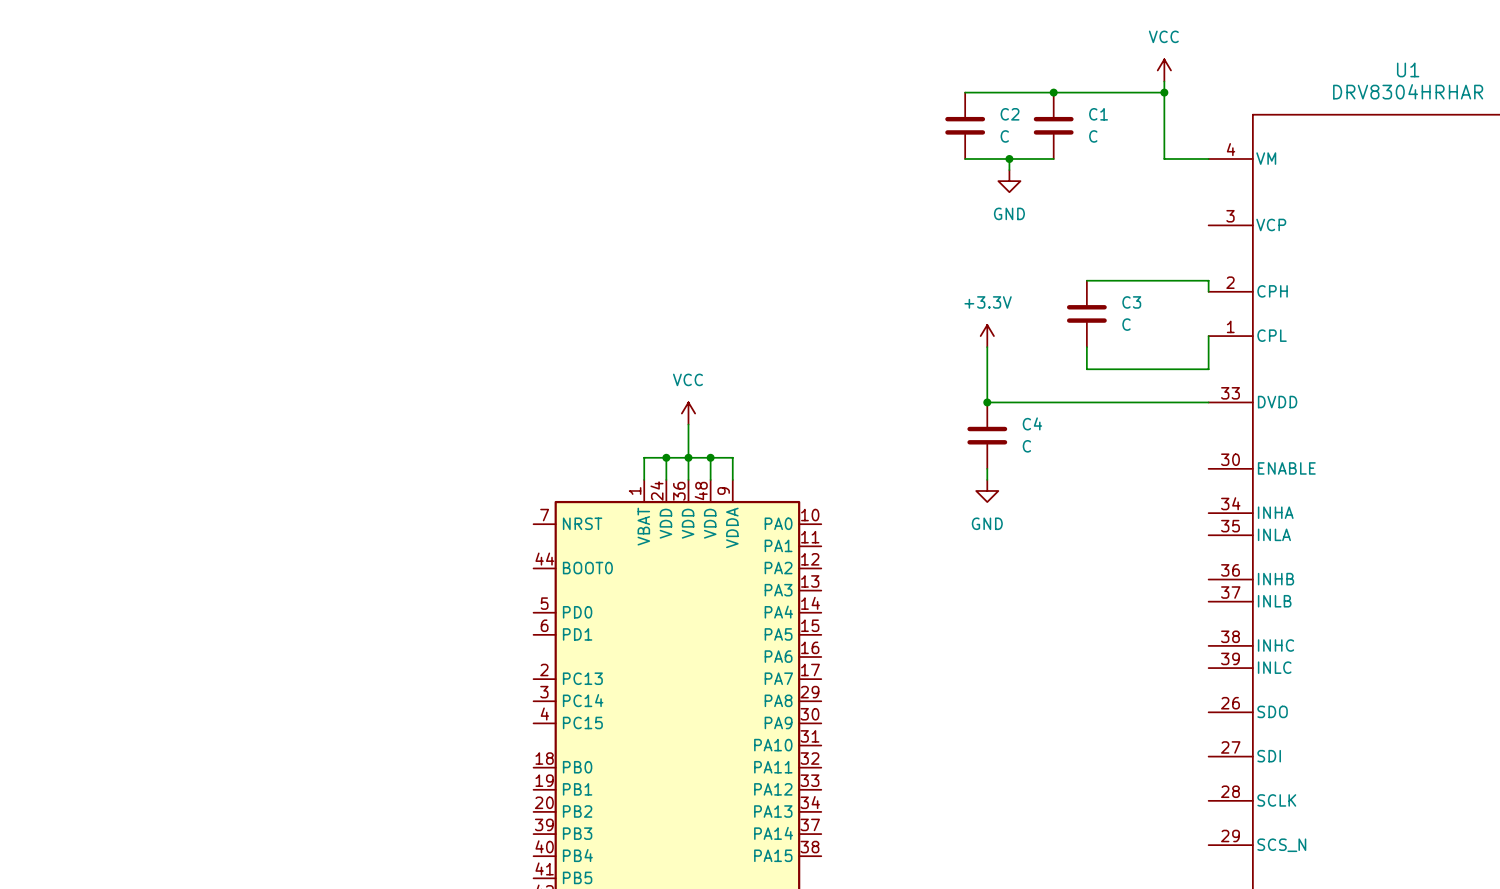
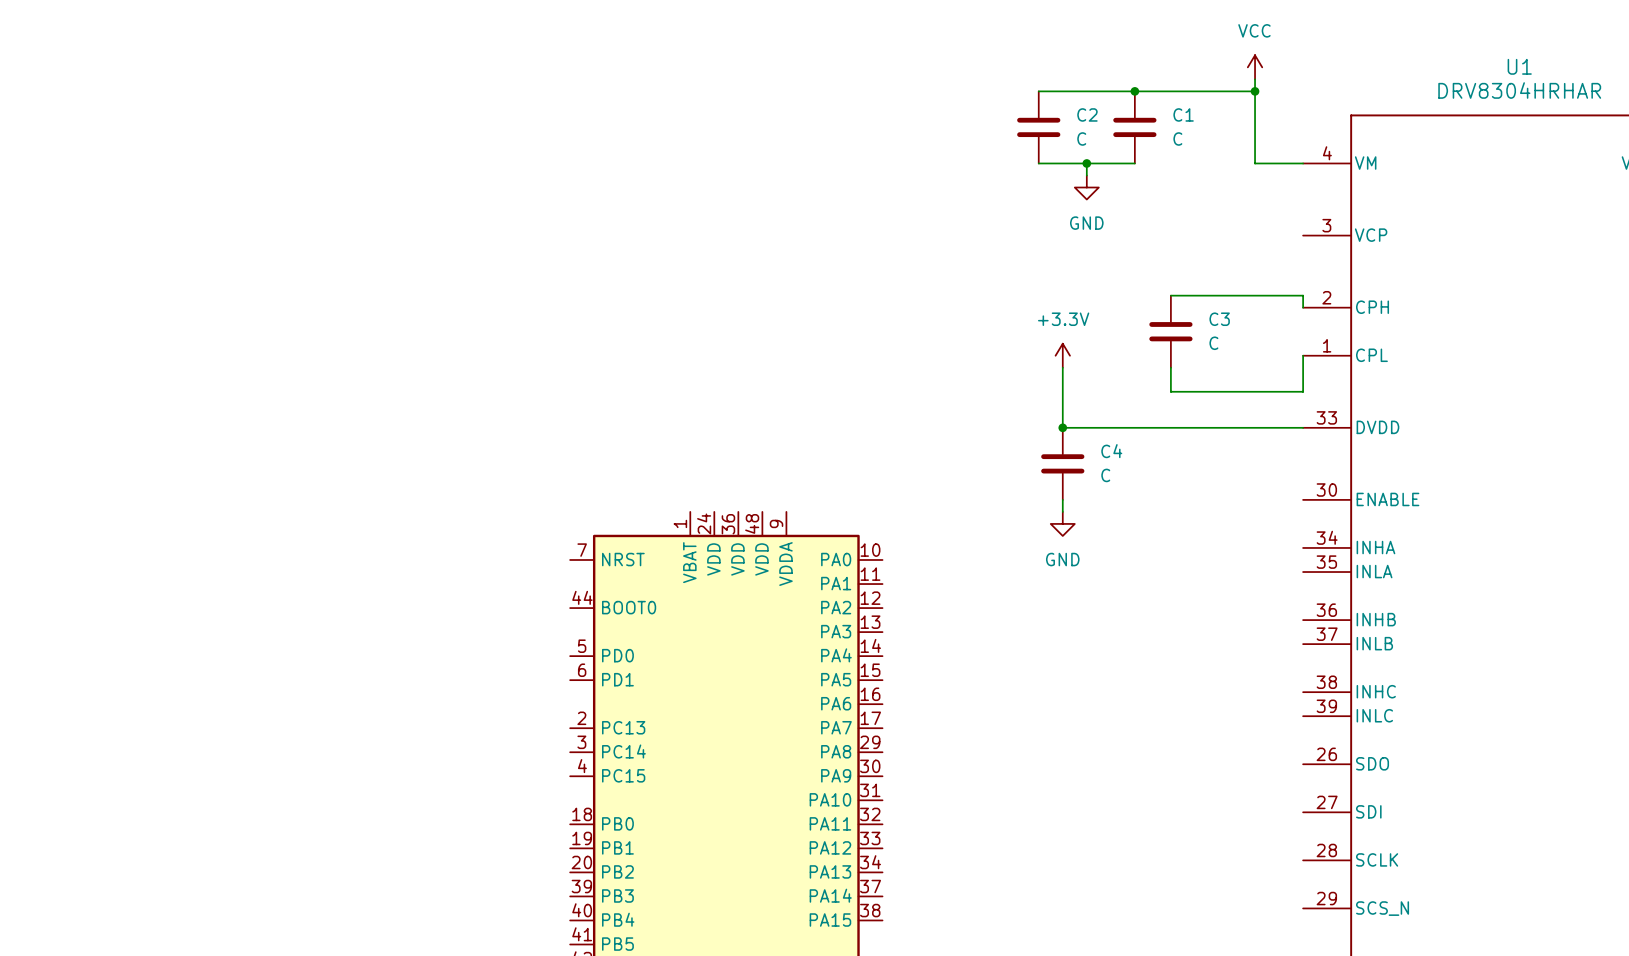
power symbol: VCC (688, 413) -> none
wire: (688, 424) (688, 479) -> none
wire: (666, 457) (666, 479) -> none
junction: (666, 457) -> none
junction: (688, 457) -> none
wire: (710, 457) (710, 479) -> none
junction: (710, 457) -> none
wire: (644, 479) (644, 457) (732, 457) (732, 479) -> none

